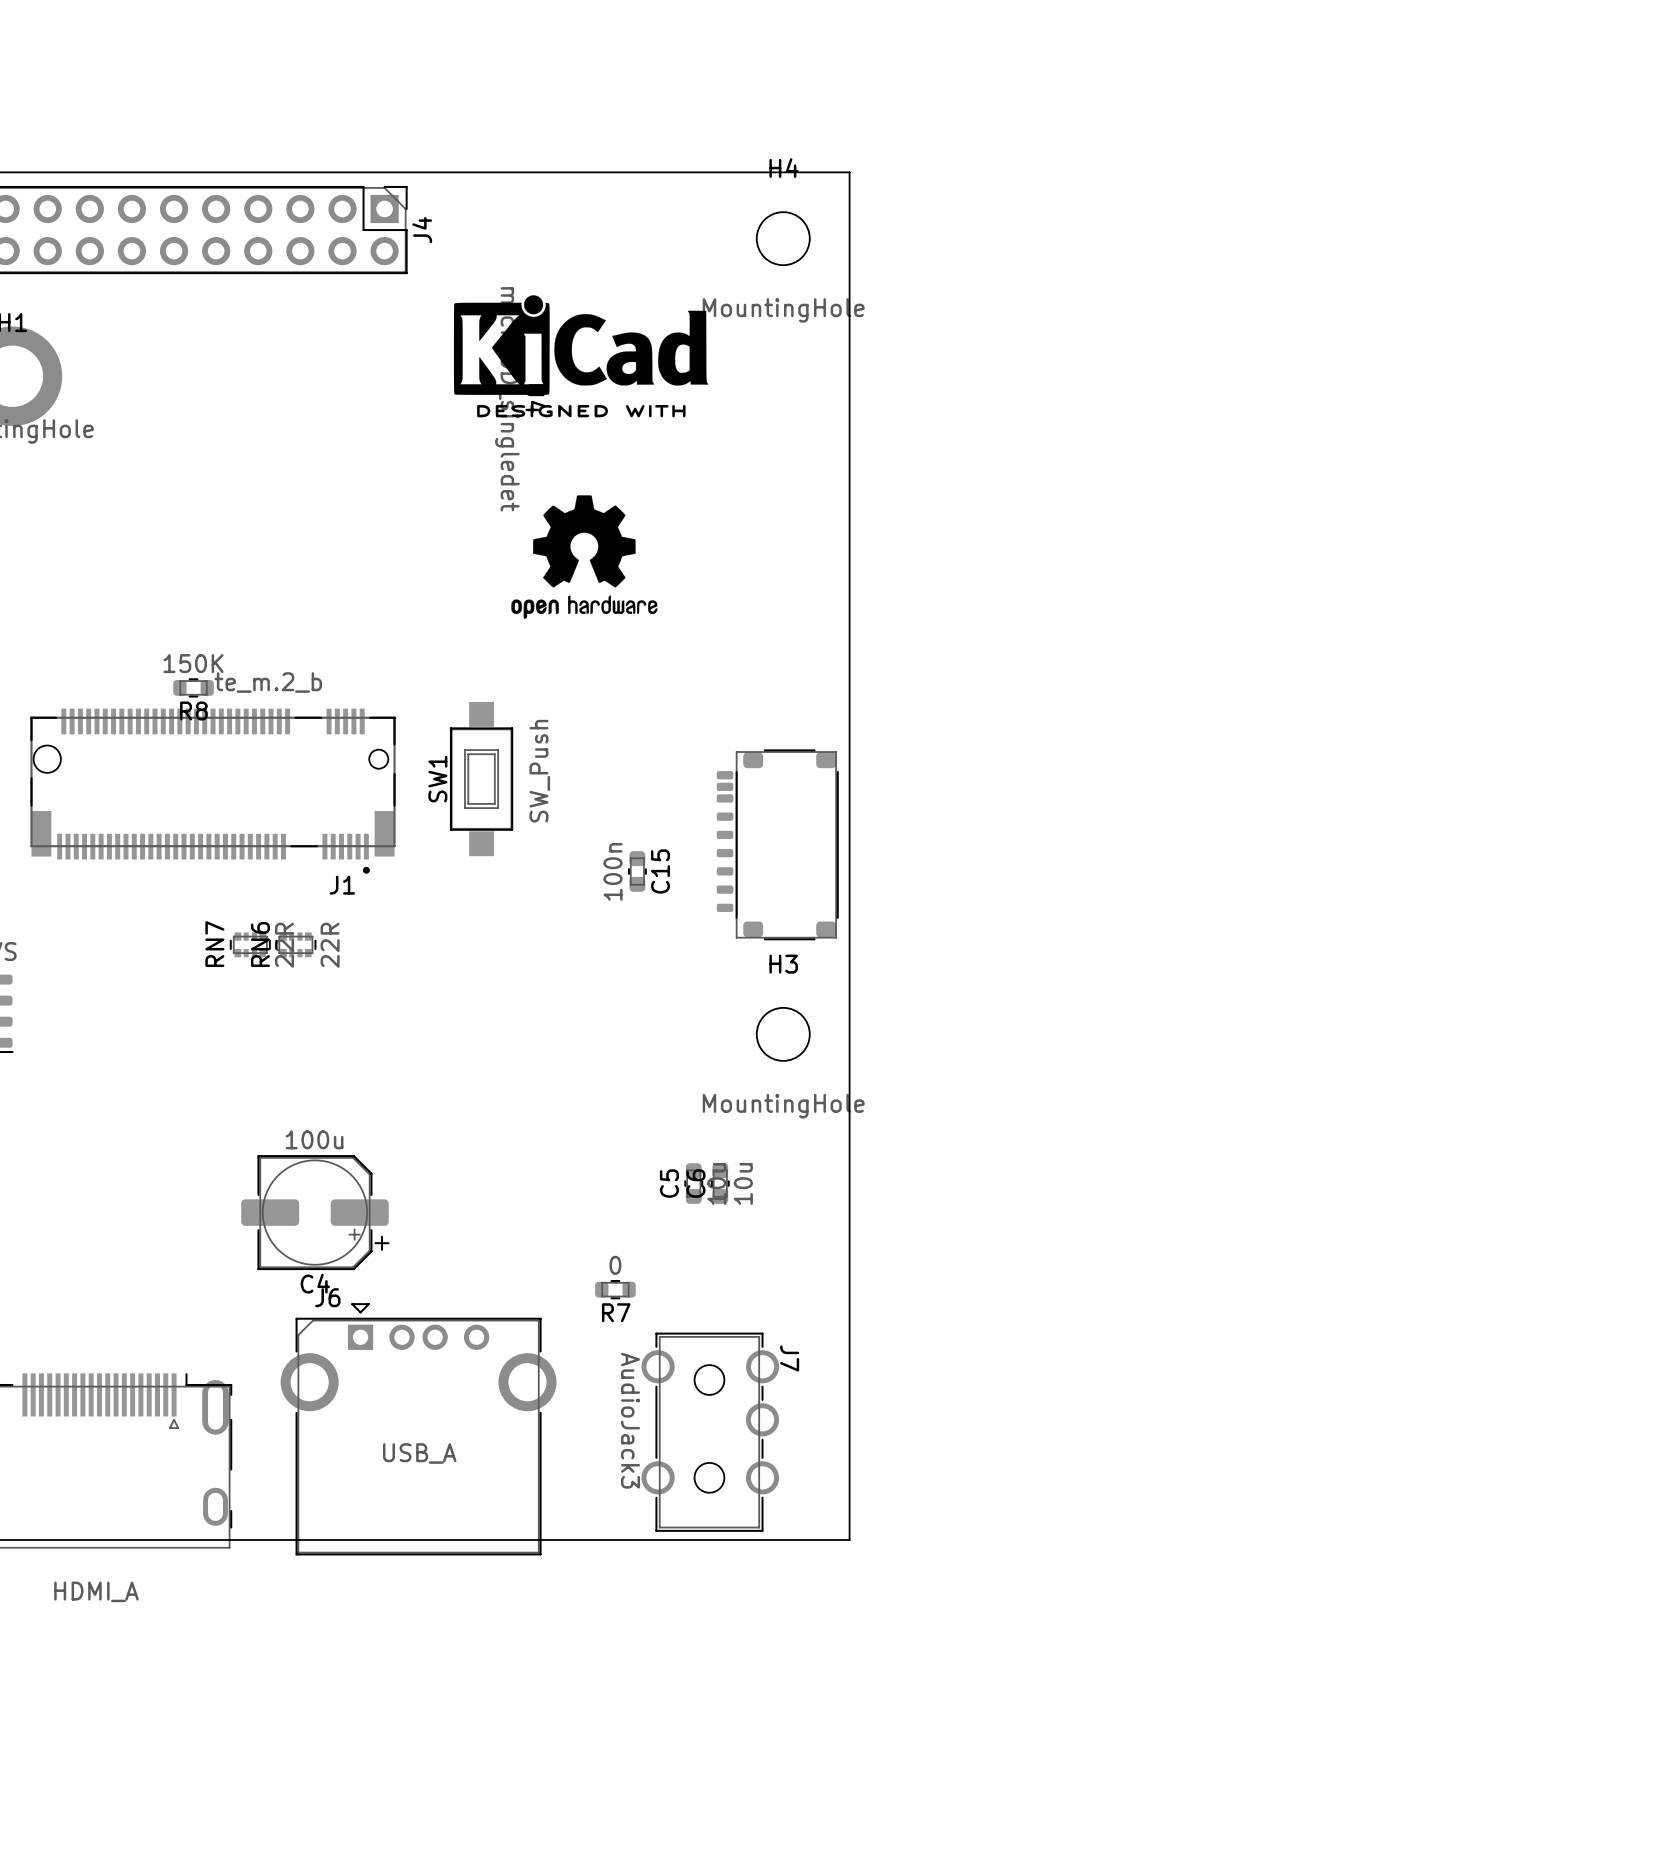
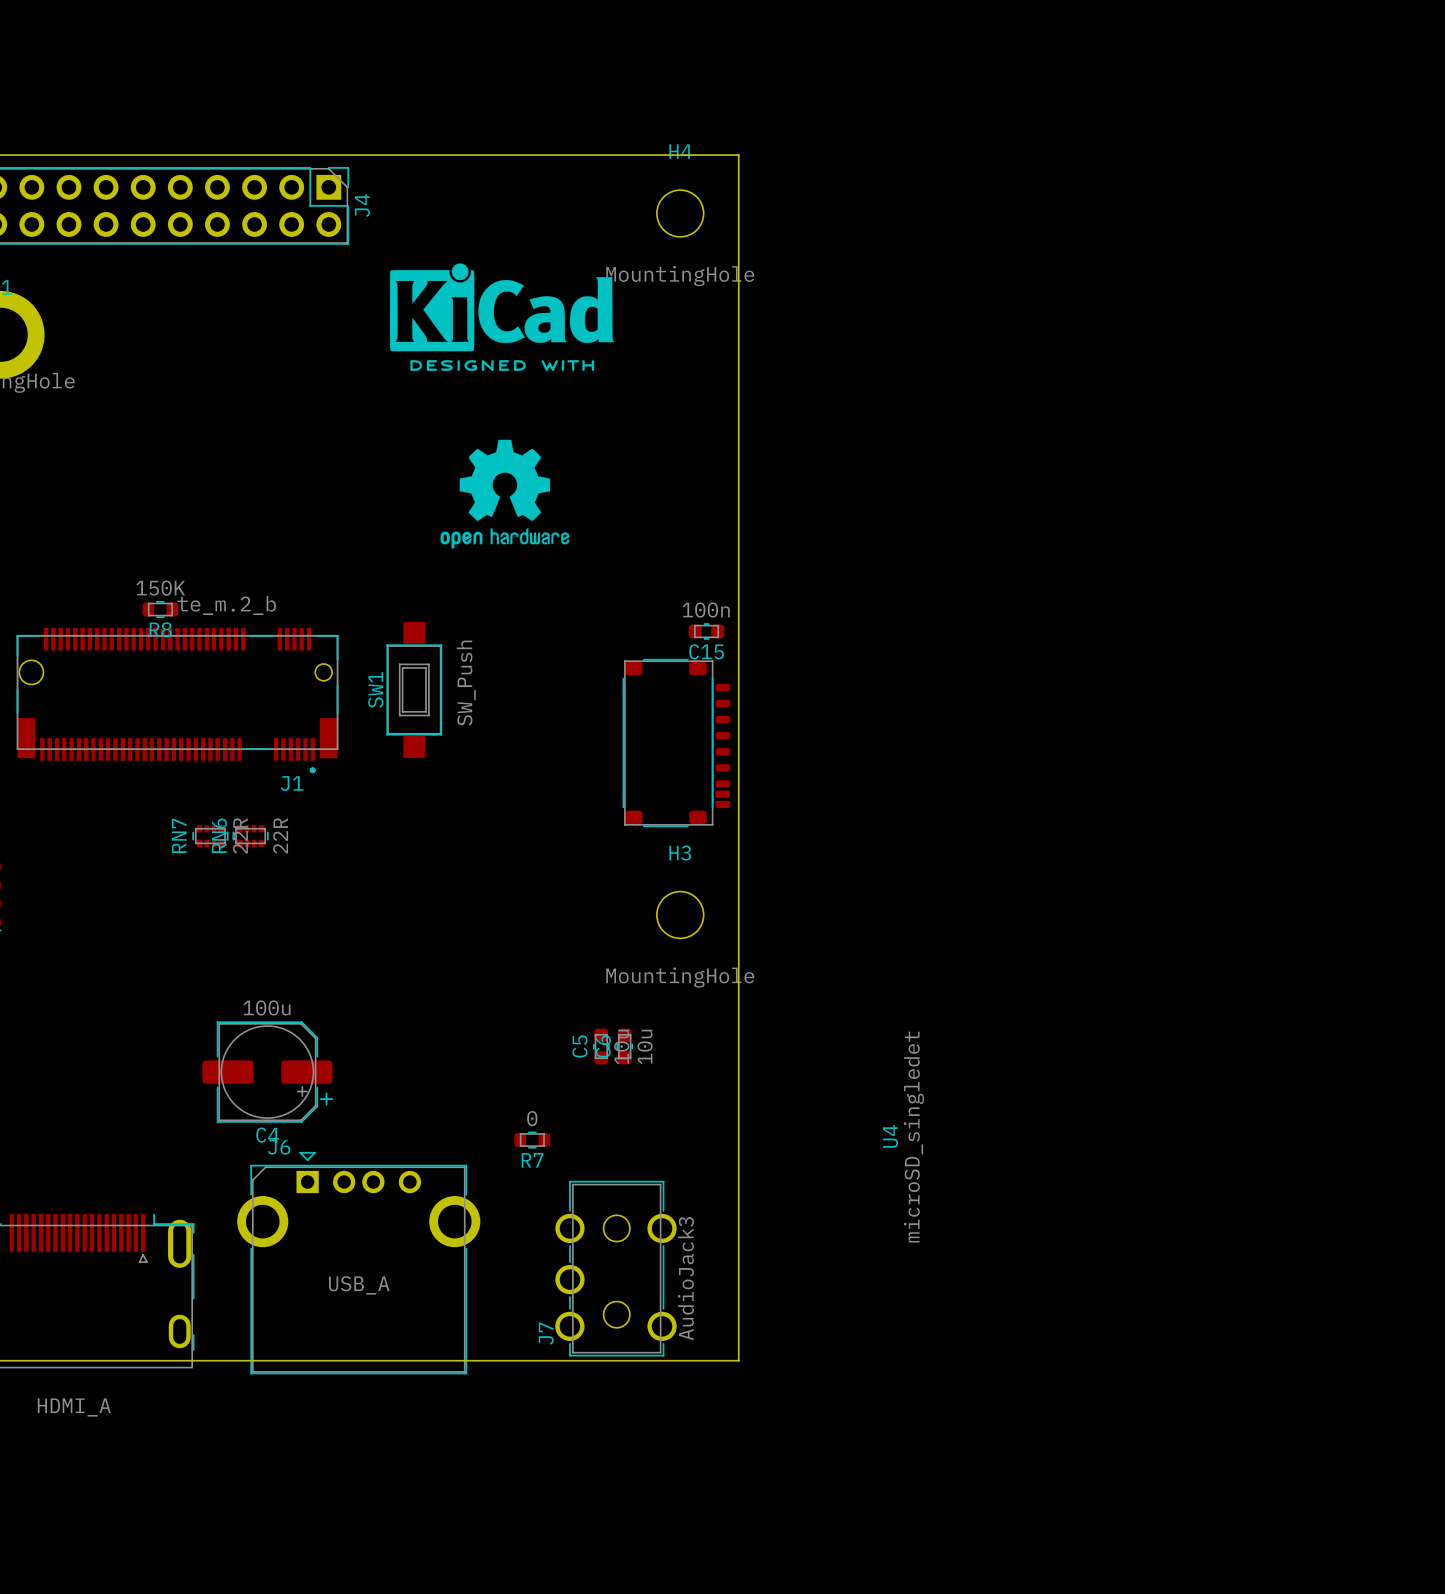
U4 rotation: 0° (777, 844) -> 180° (676, 743)
C15 rotation: 0° (637, 871) -> 90° clockwise (706, 631)
C15 position: (637, 871) -> (706, 631)
J7 rotation: 0° (710, 1432) -> 180° (615, 1268)

